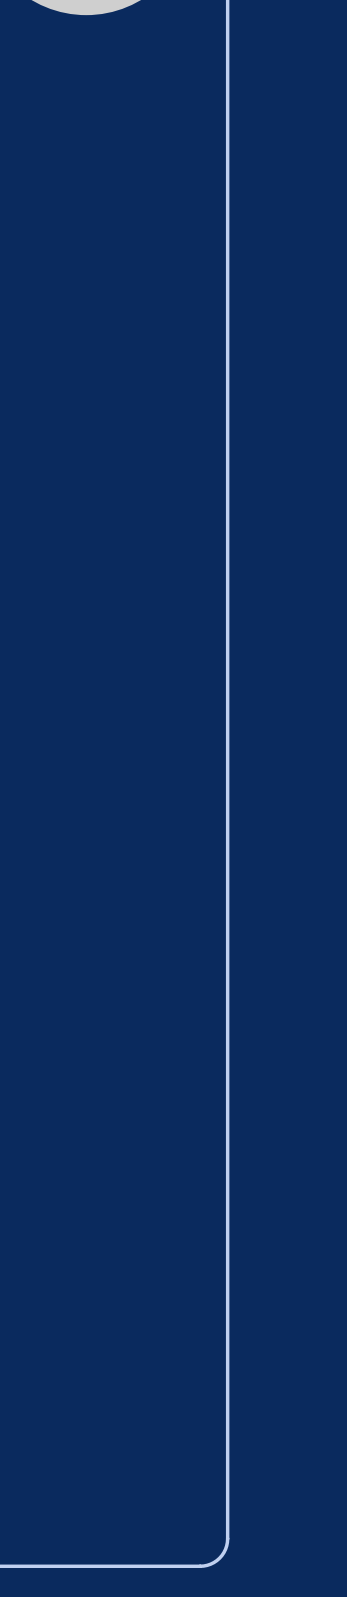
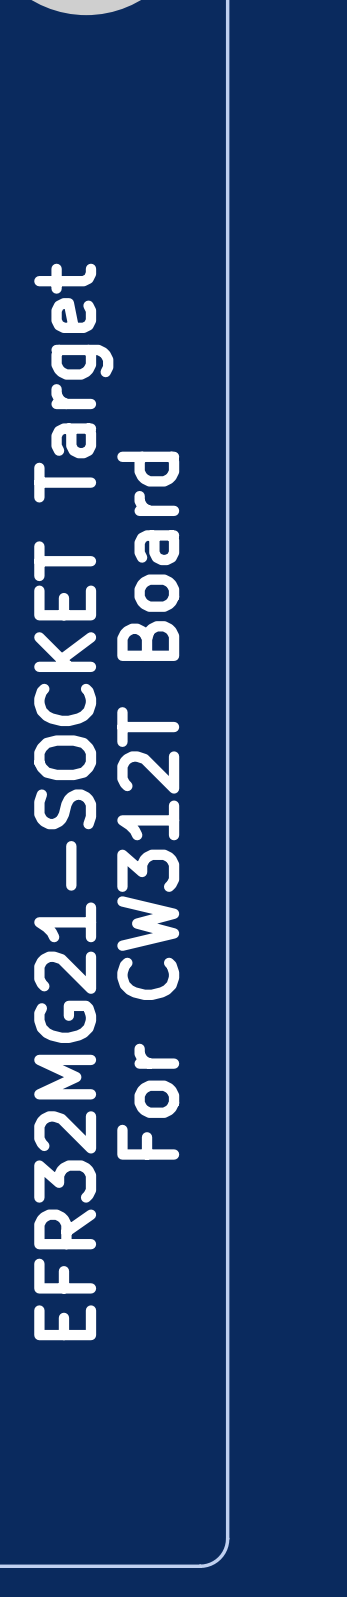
text: none -> EFR32MG21-SOCKET Target (73, 801)
text: none -> For CW312T Board (148, 805)

